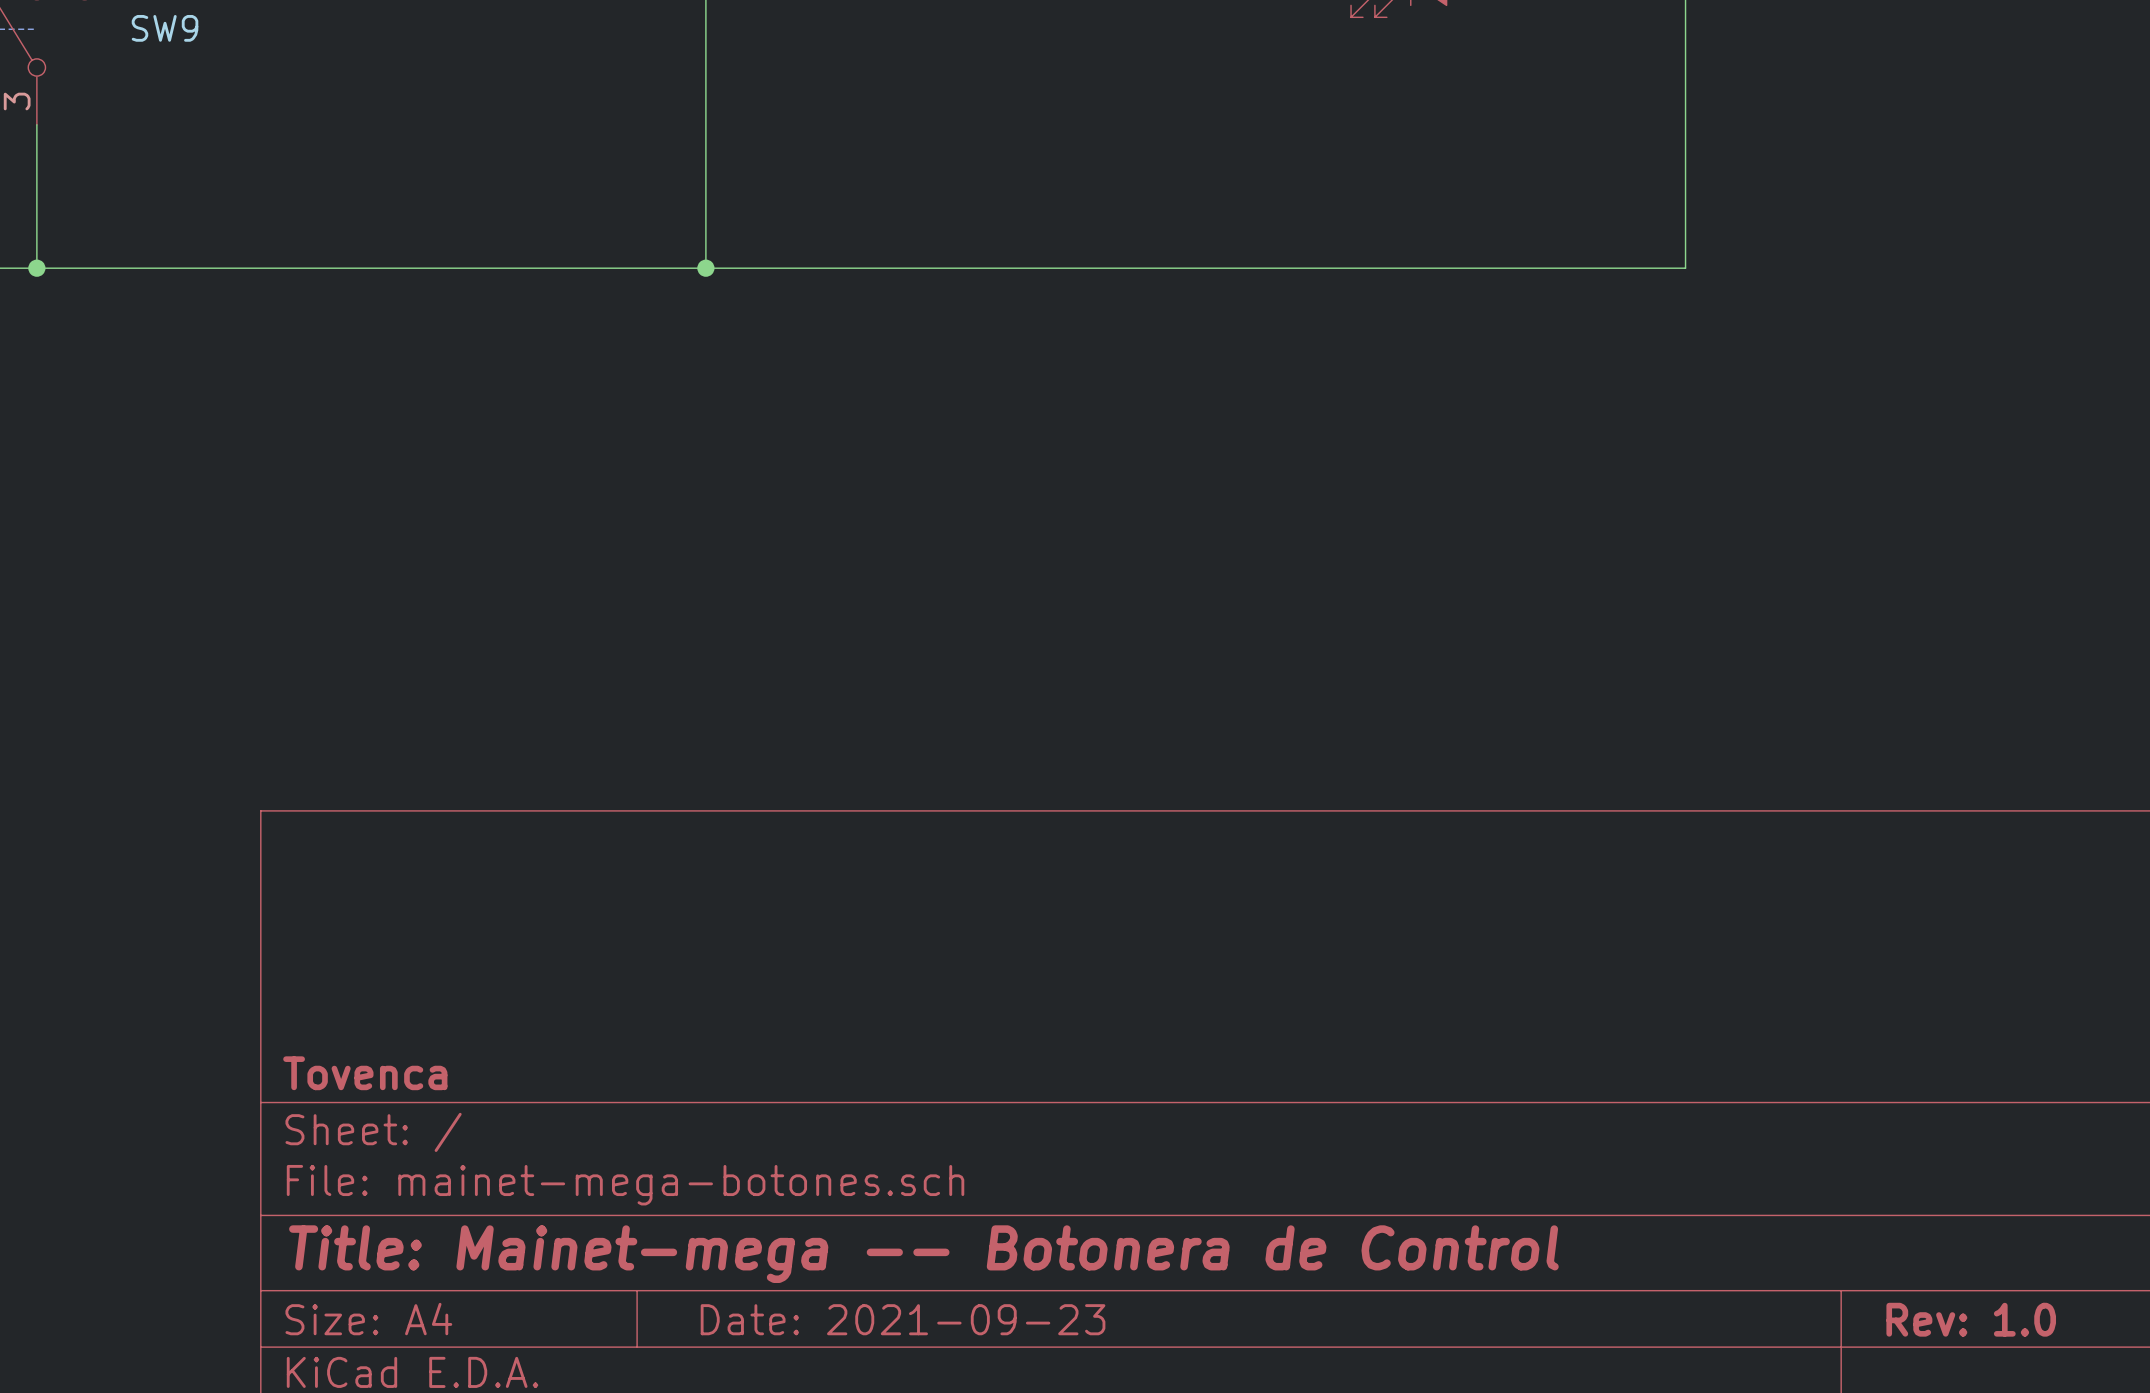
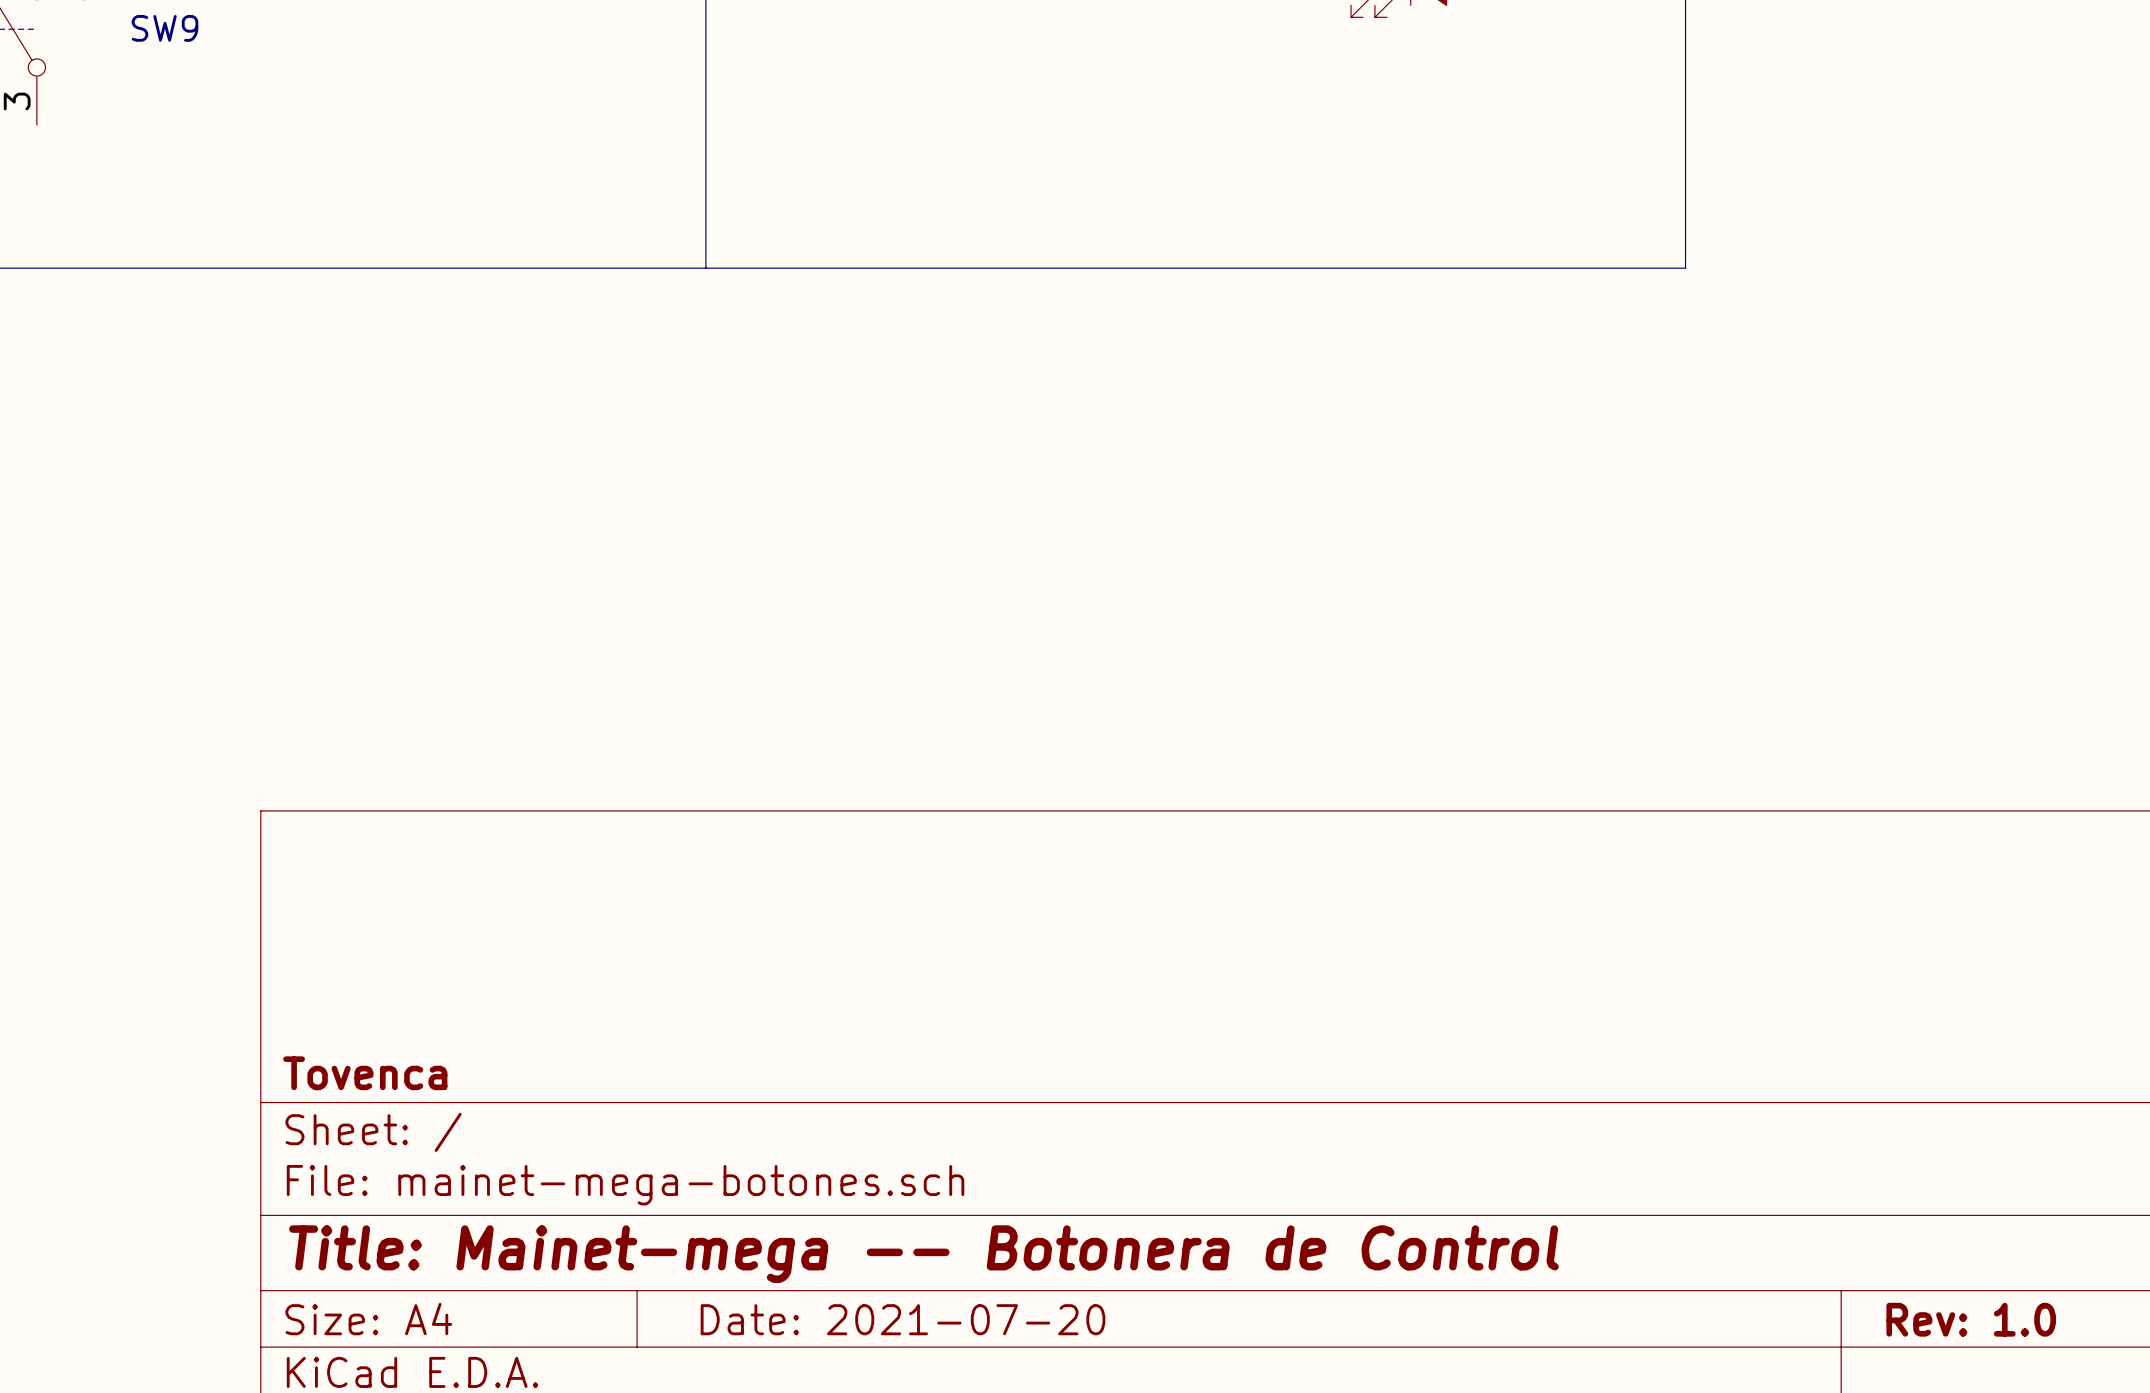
wire: (36, 124) (36, 268) -> none
junction: (36, 268) -> none
junction: (705, 268) -> none
title block: Date: 2021-09-23 (903, 1319) -> Date: 2021-07-20 (903, 1319)

